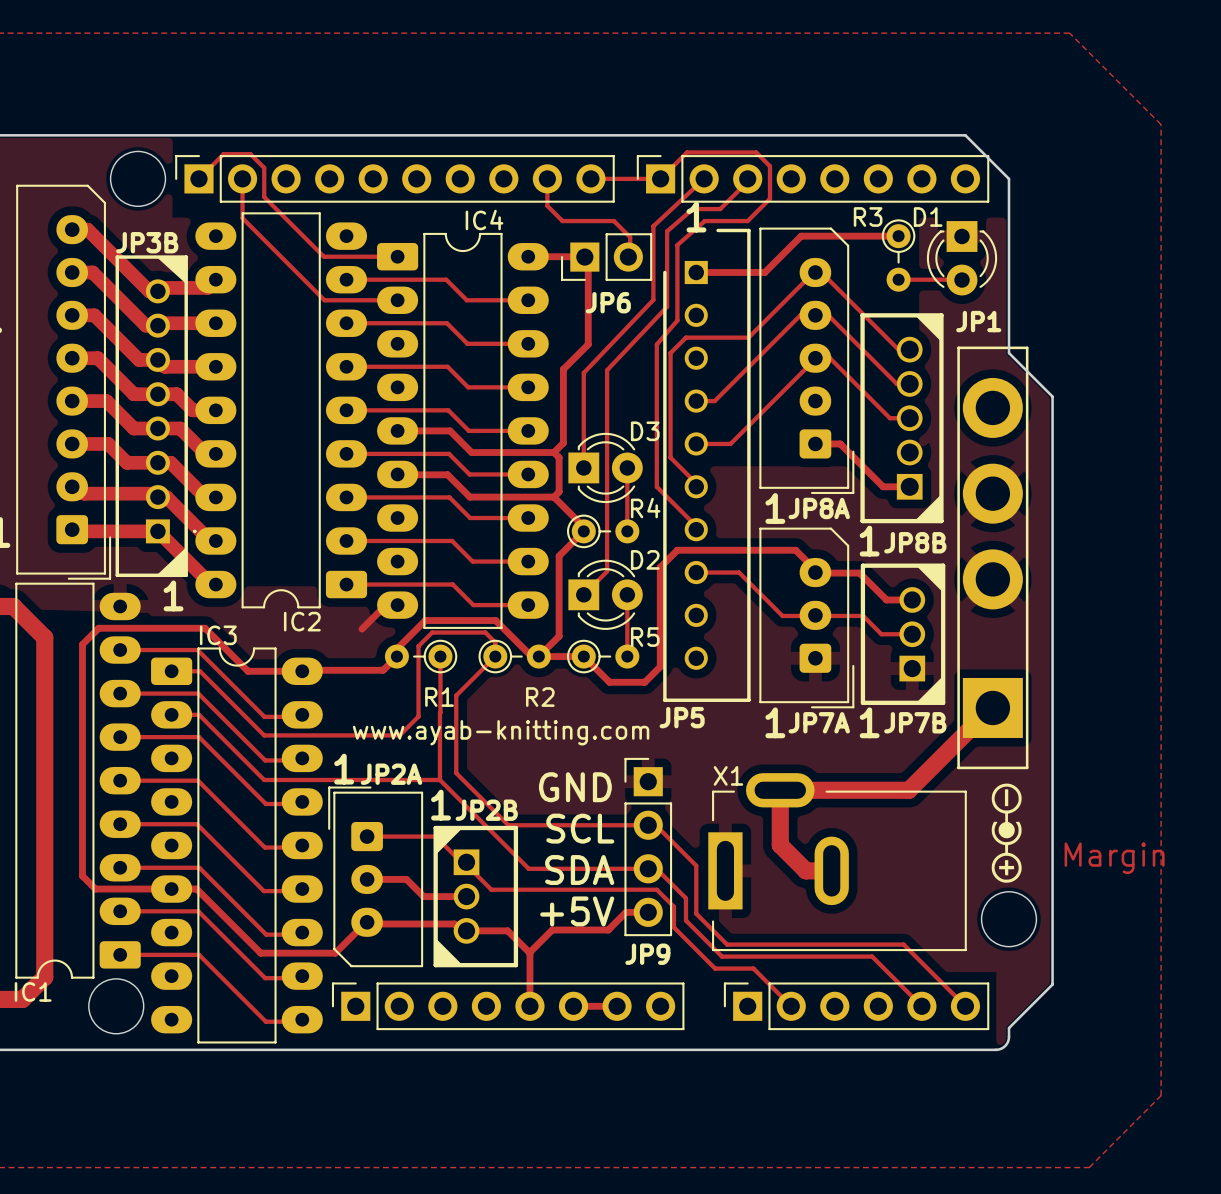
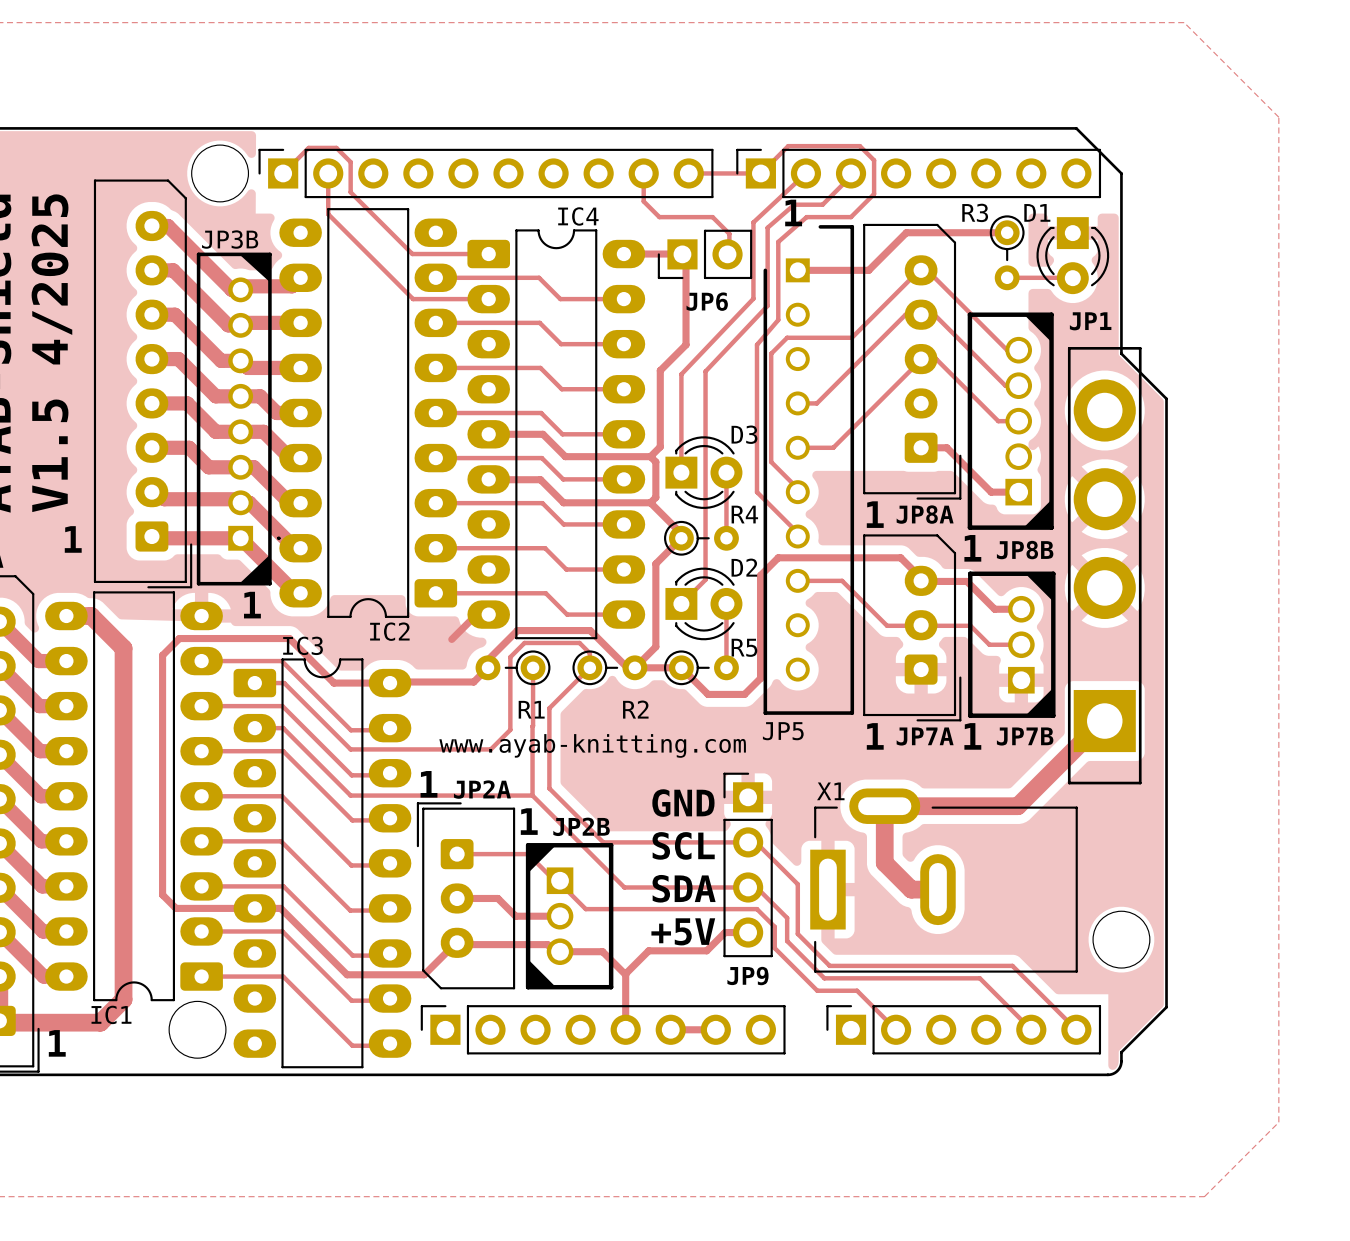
drawing: [991, 783, 1022, 883] -> none
text: Margin (1114, 858) -> none

